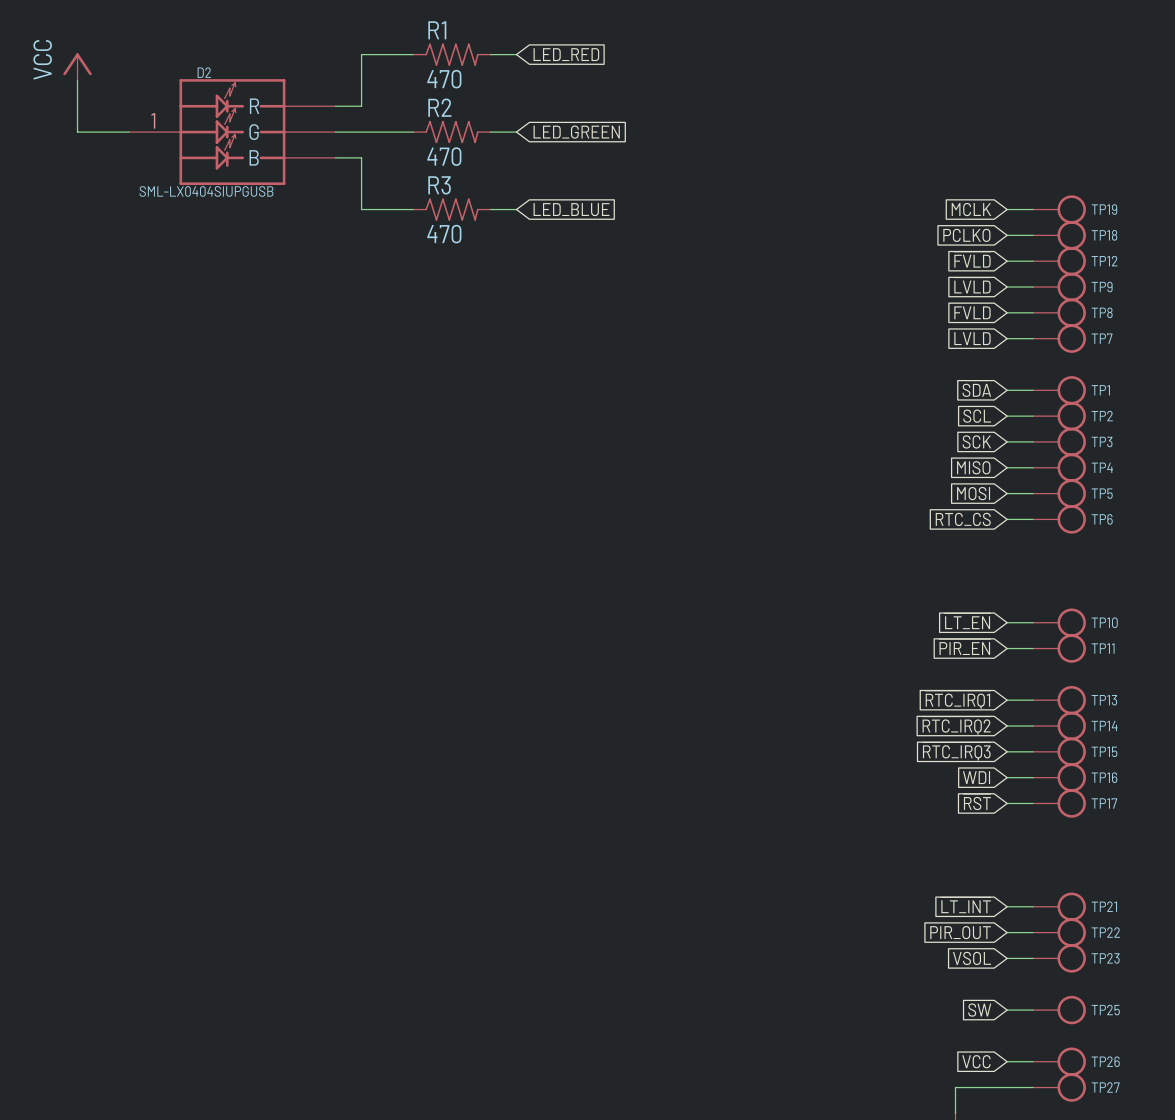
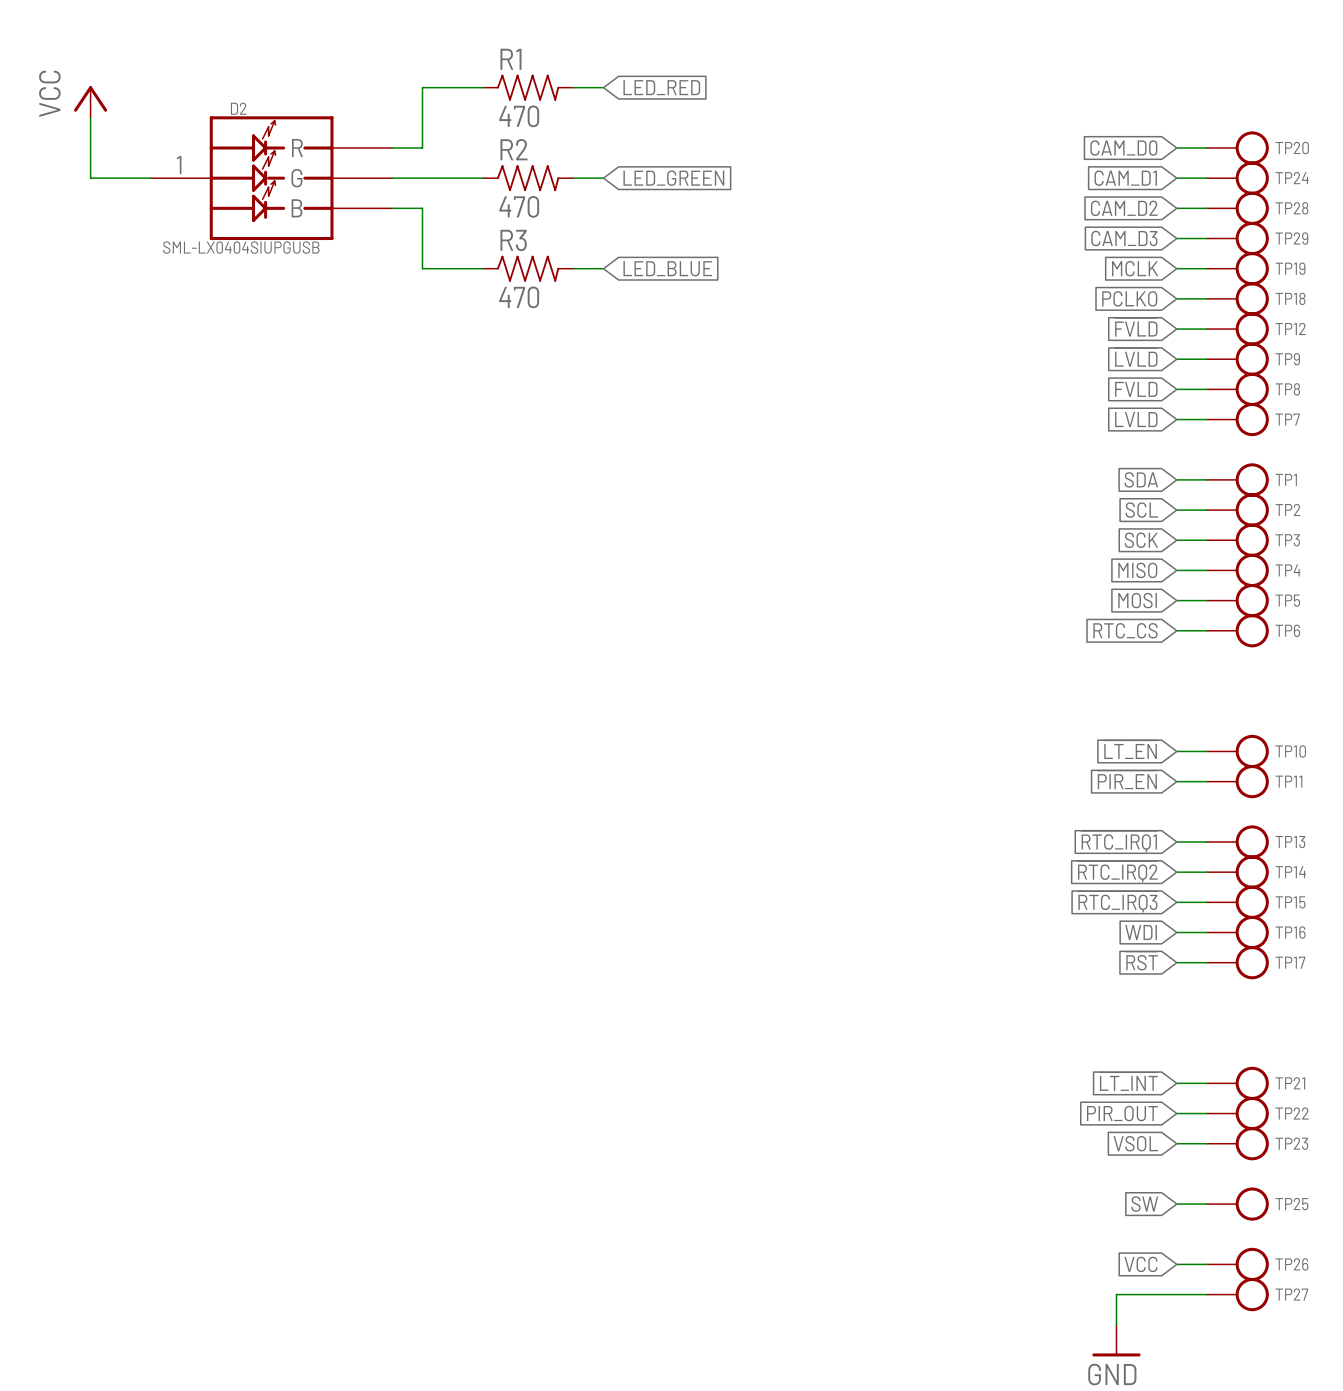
global label: none -> CAM_D0 (1123, 148)
wire: none -> (1176, 148) (1206, 148)
TP20: none -> (1237, 148)
global label: none -> CAM_D1 (1125, 178)
wire: none -> (1176, 178) (1206, 178)
TP24: none -> (1237, 178)
global label: none -> CAM_D2 (1124, 208)
wire: none -> (1176, 208) (1206, 208)
TP28: none -> (1237, 208)
global label: none -> CAM_D3 (1124, 238)
wire: none -> (1176, 238) (1206, 238)
TP29: none -> (1237, 238)

